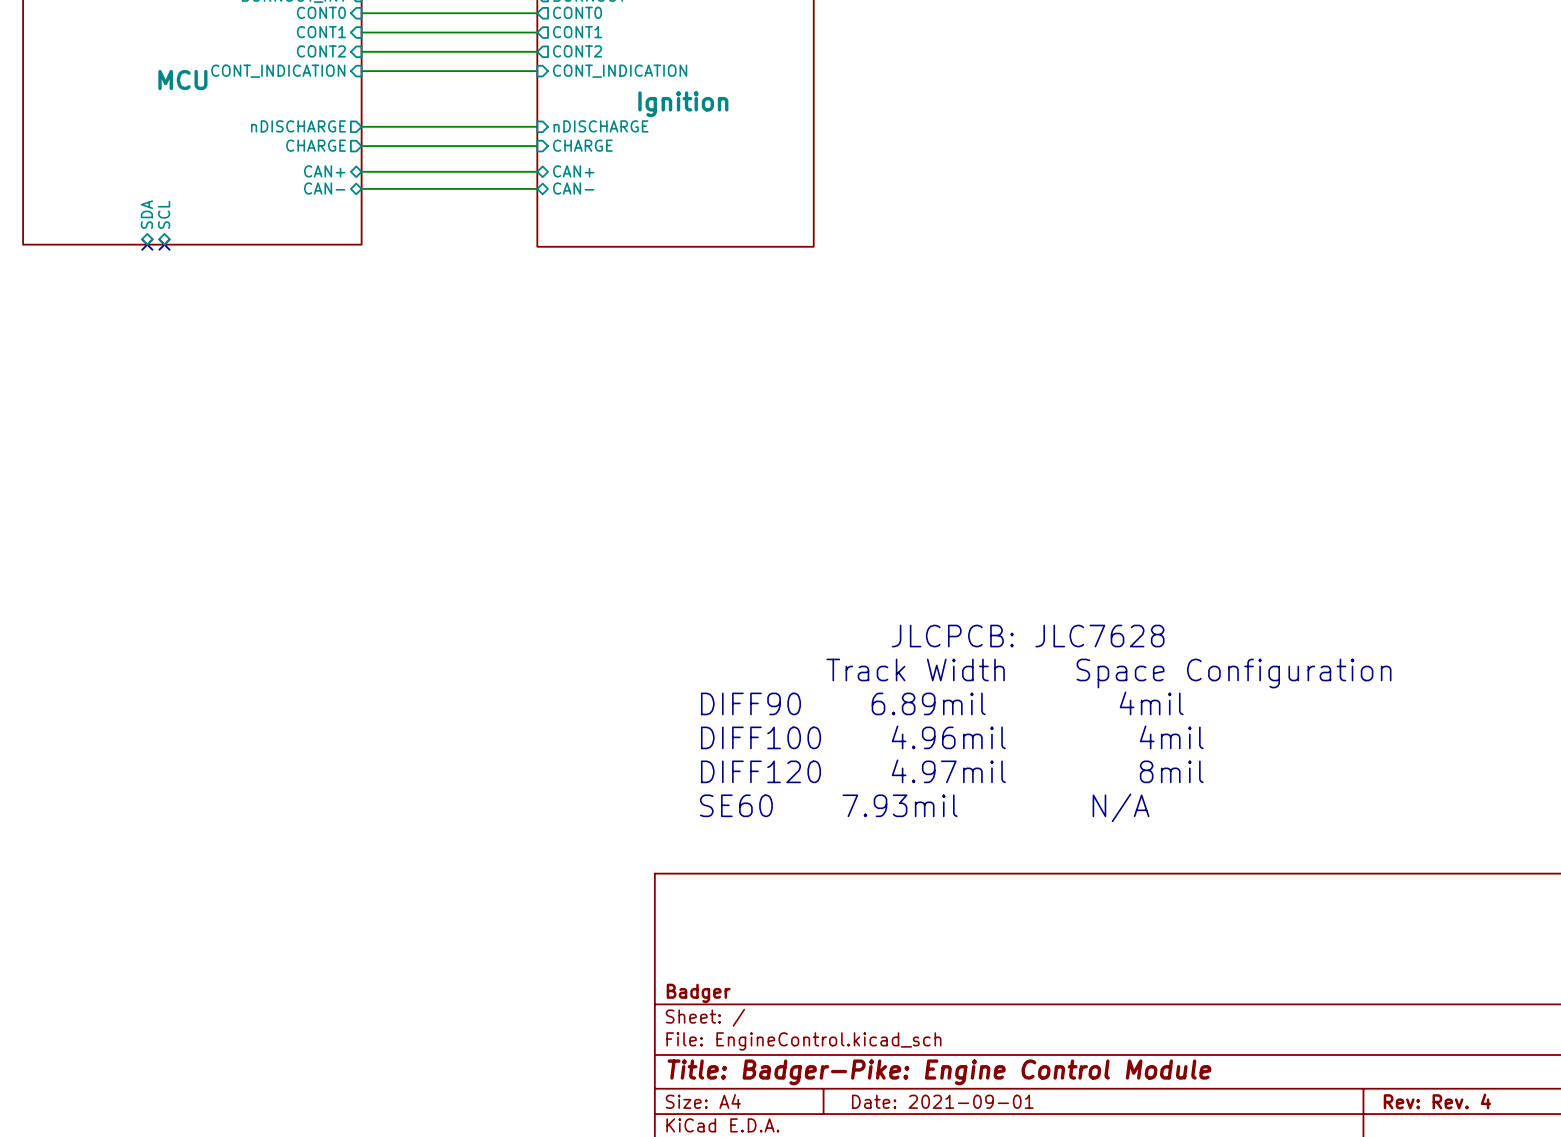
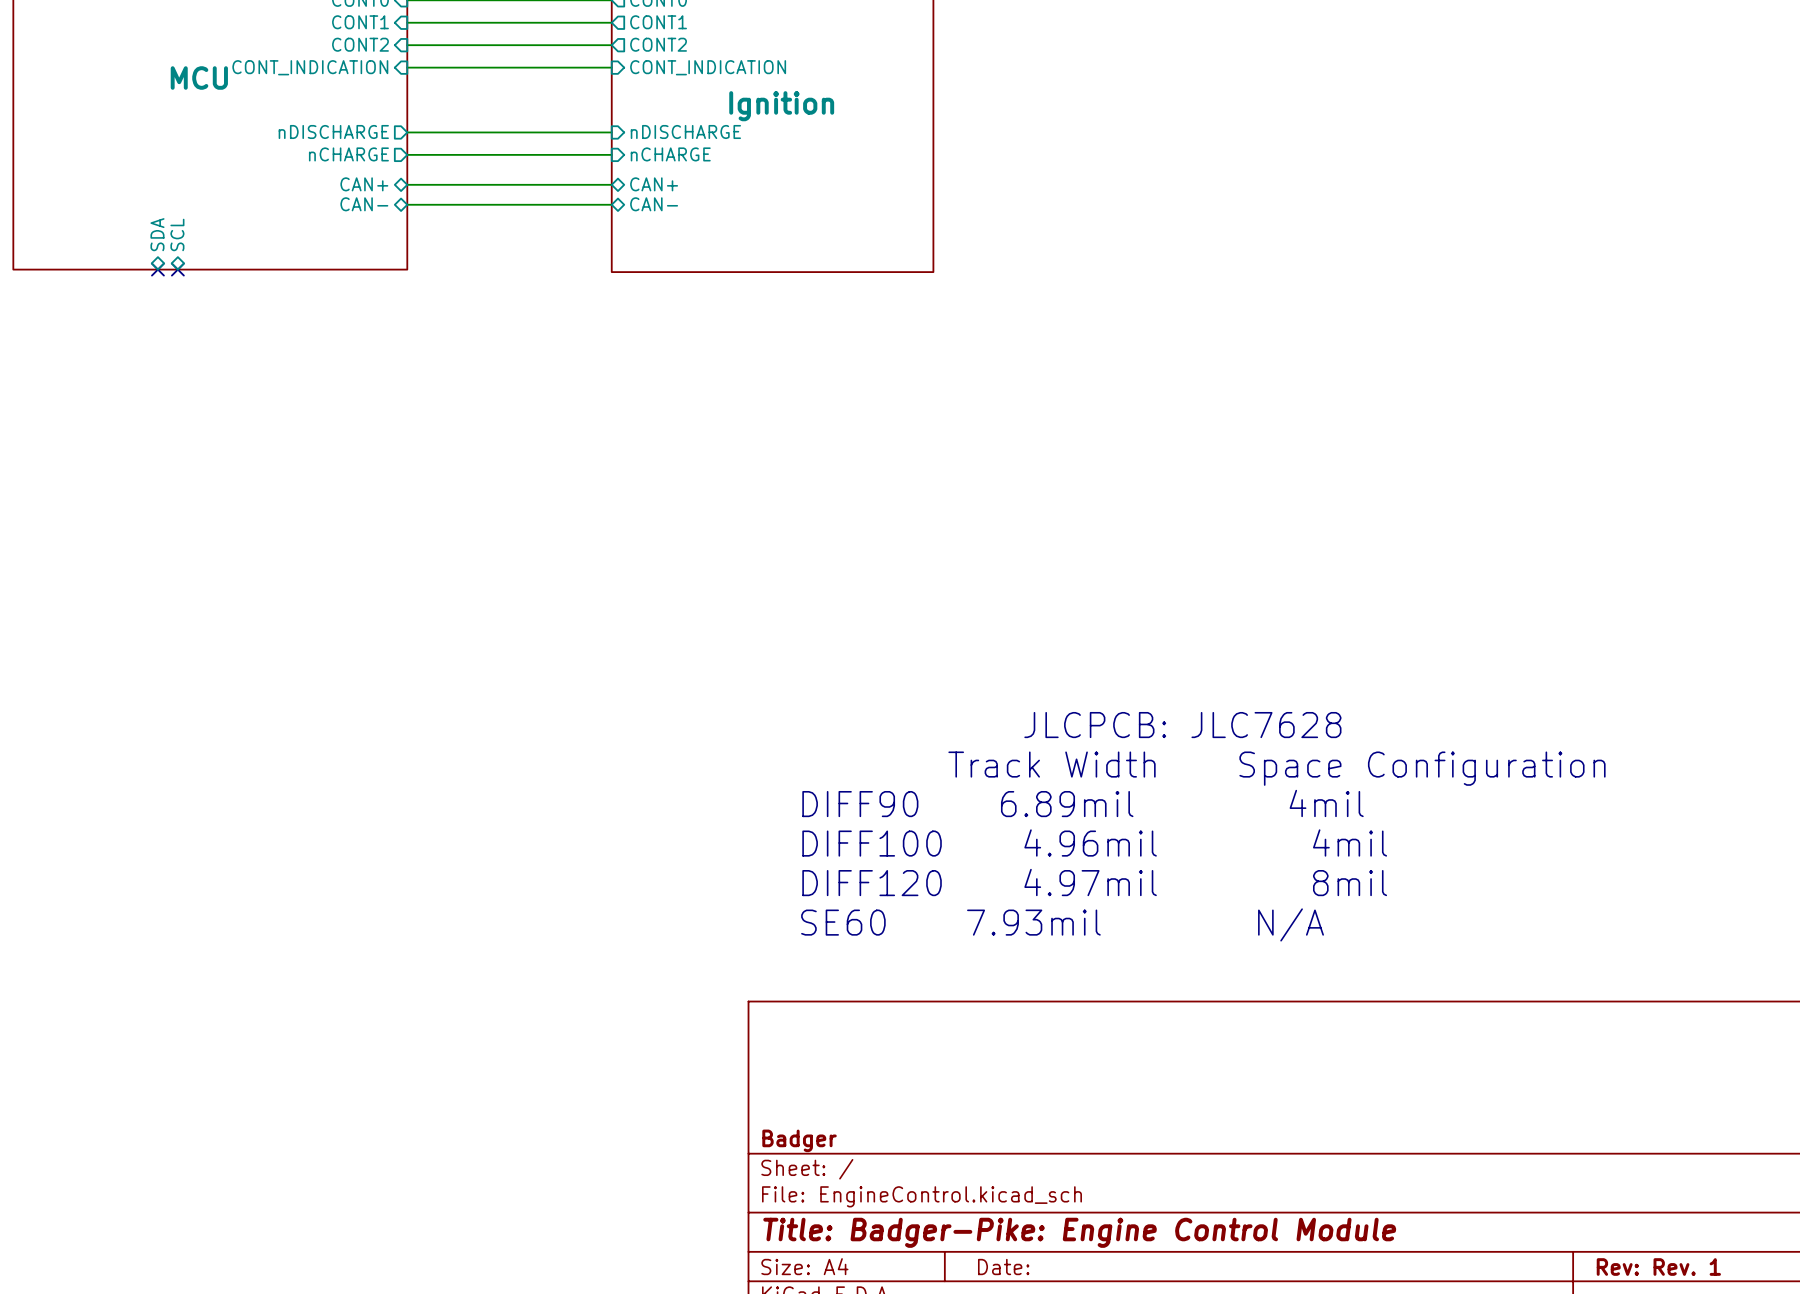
sheet pin: CHARGE (316, 145) -> nCHARGE (348, 154)
sheet pin: CHARGE (582, 145) -> nCHARGE (670, 154)
title block: Date: 2021-09-01 (942, 1101) -> Date: (1003, 1267)
title block: Rev: Rev. 4 (1437, 1101) -> Rev: Rev. 1 (1658, 1267)

